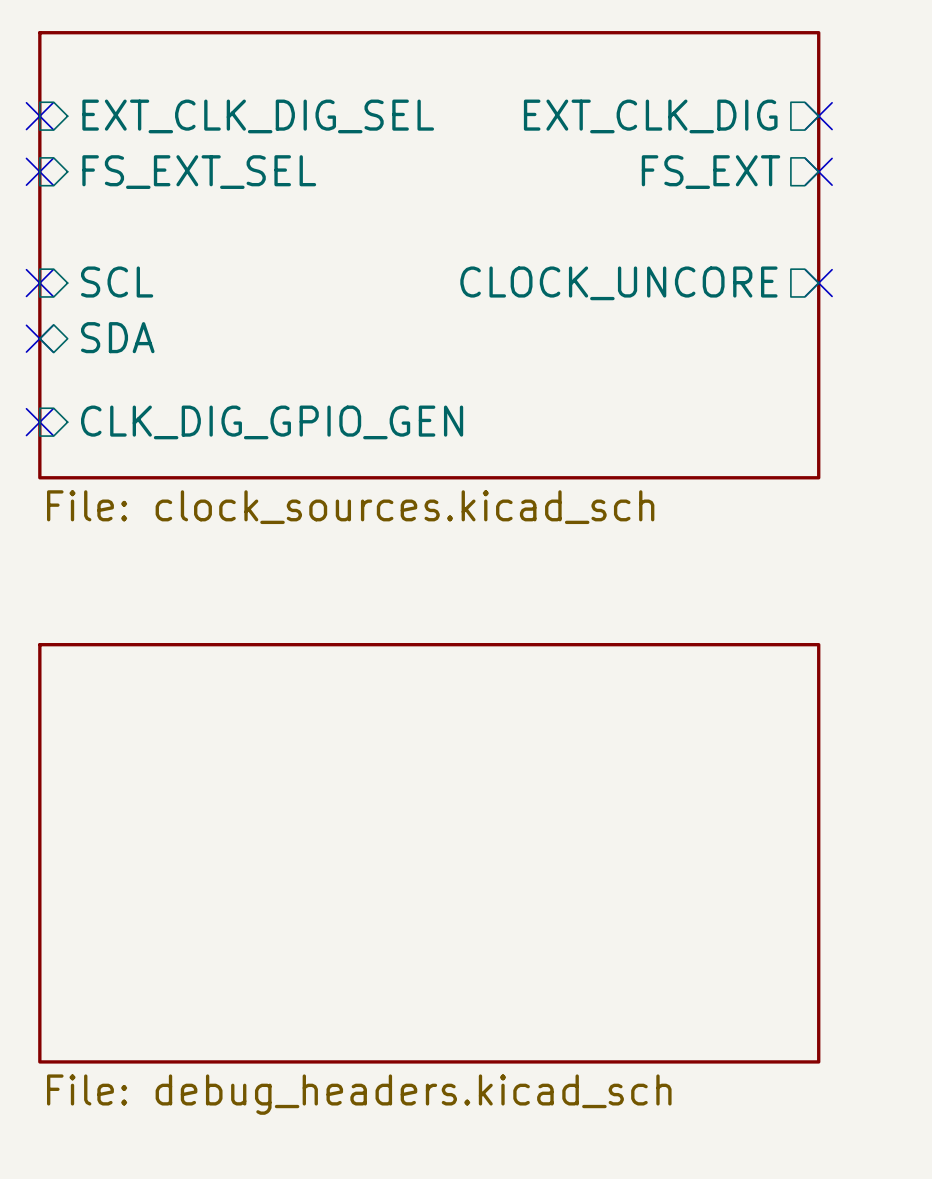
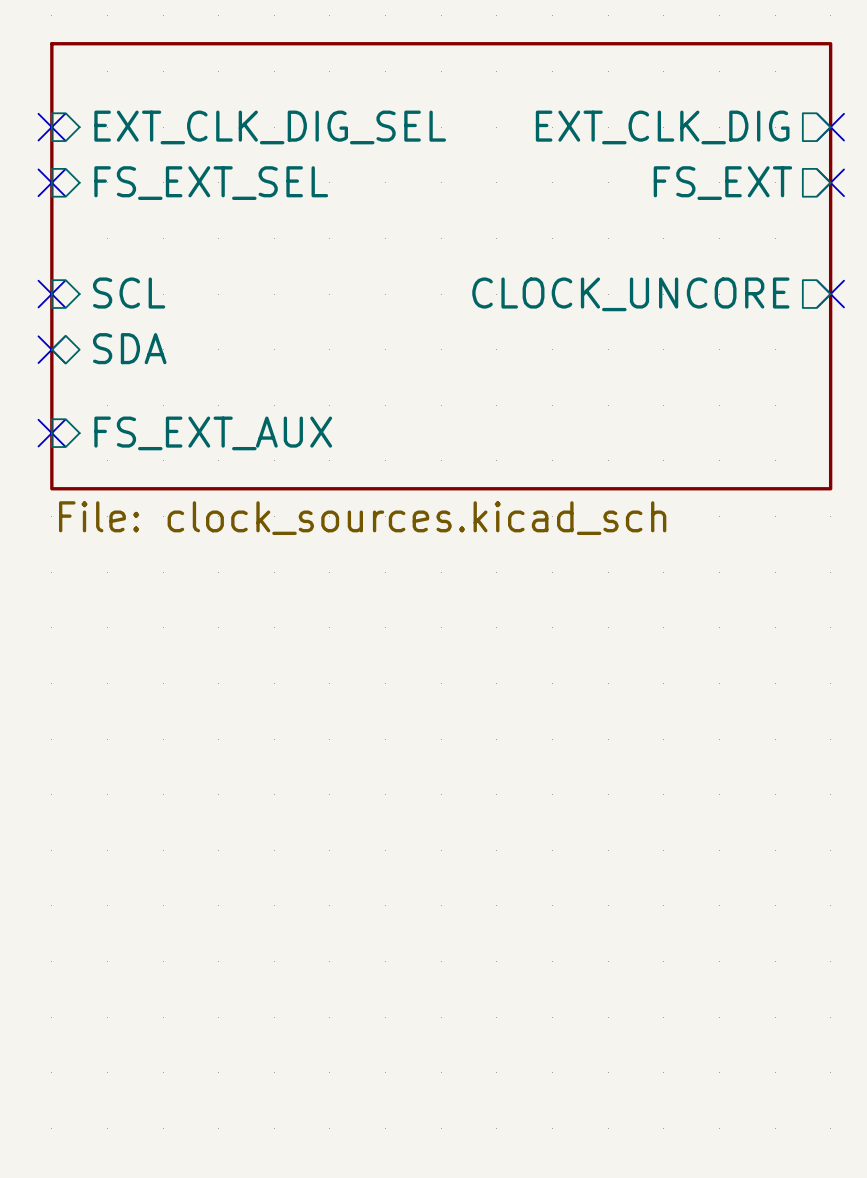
sheet pin: CLK_DIG_GPIO_GEN (272, 422) -> FS_EXT_AUX (213, 433)
sheet: File: debug_headers.kicad_sch (429, 853) -> none

